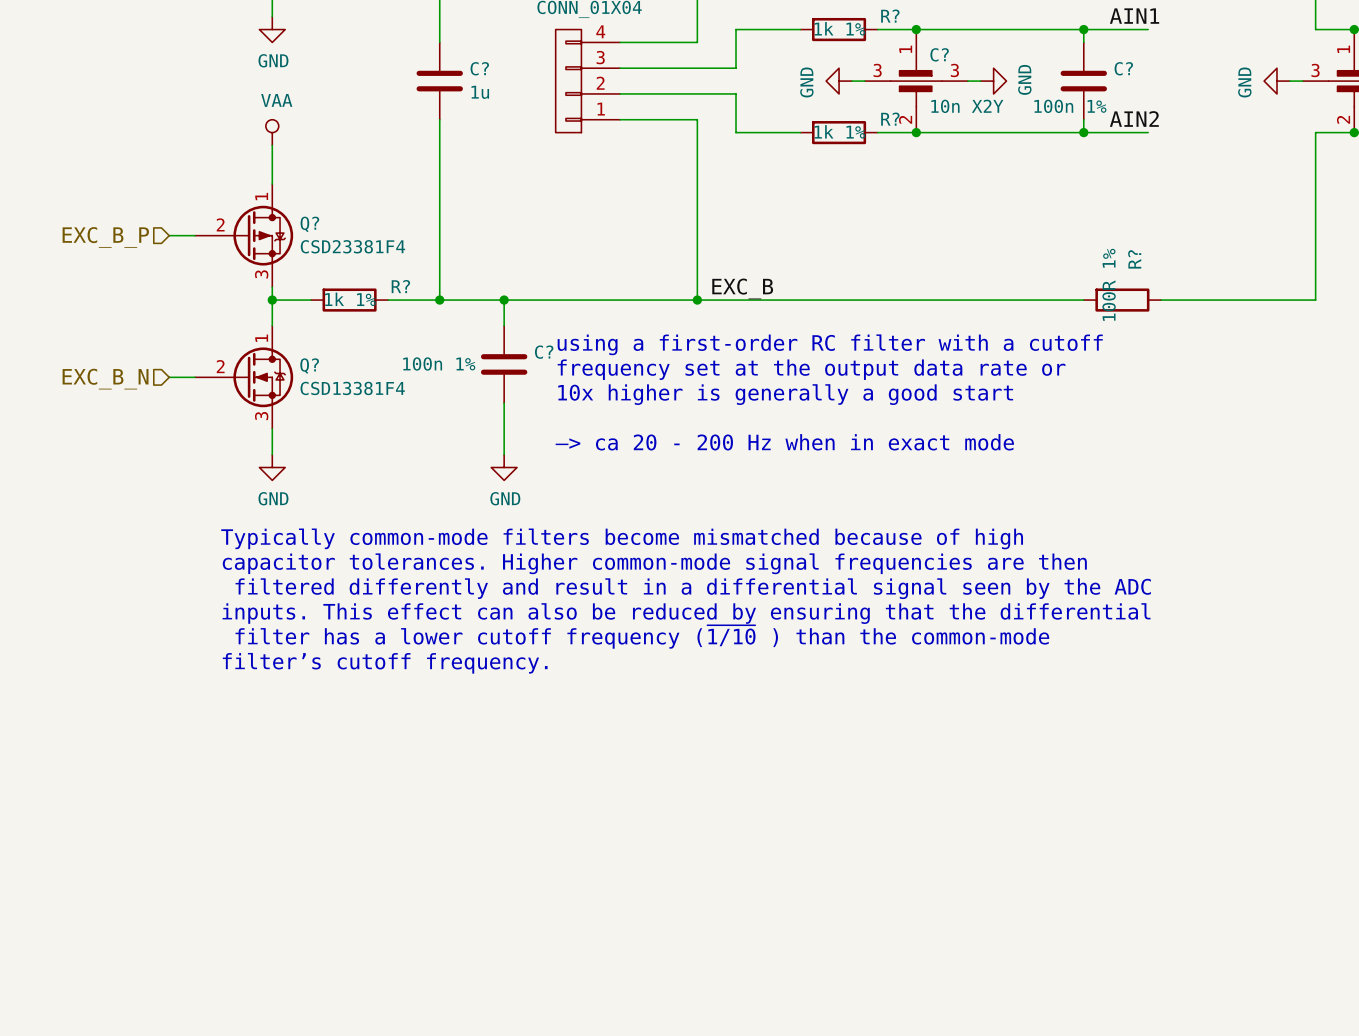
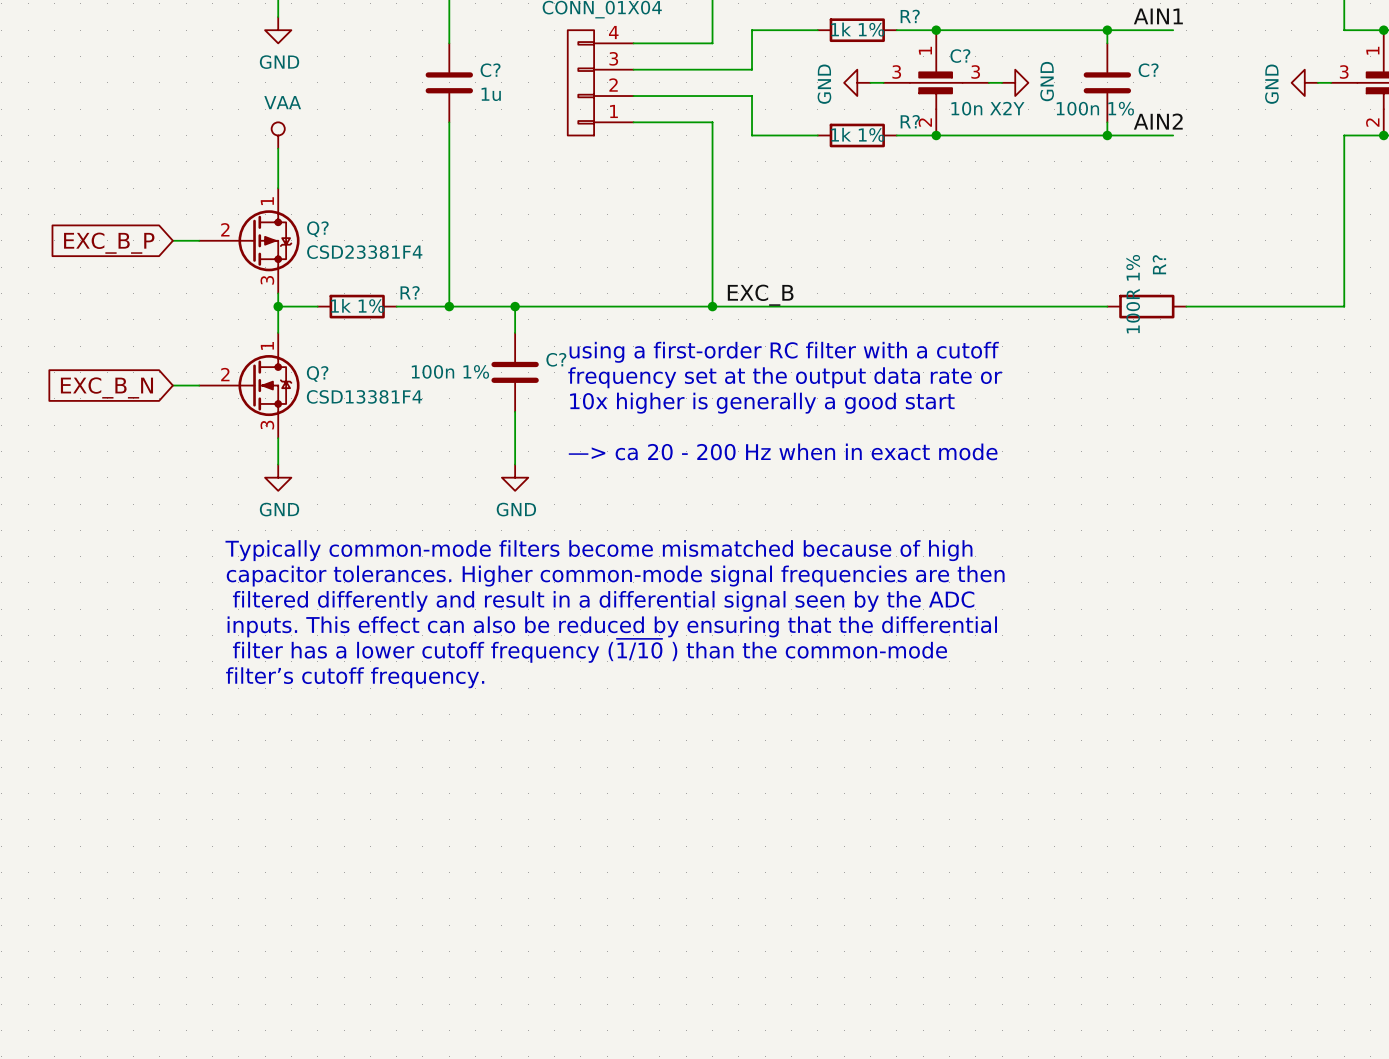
hierarchical label: EXC_B_P (105, 237) -> none
global label: none -> EXC_B_P (109, 243)
hierarchical label: EXC_B_N (105, 379) -> none
global label: none -> EXC_B_N (106, 387)

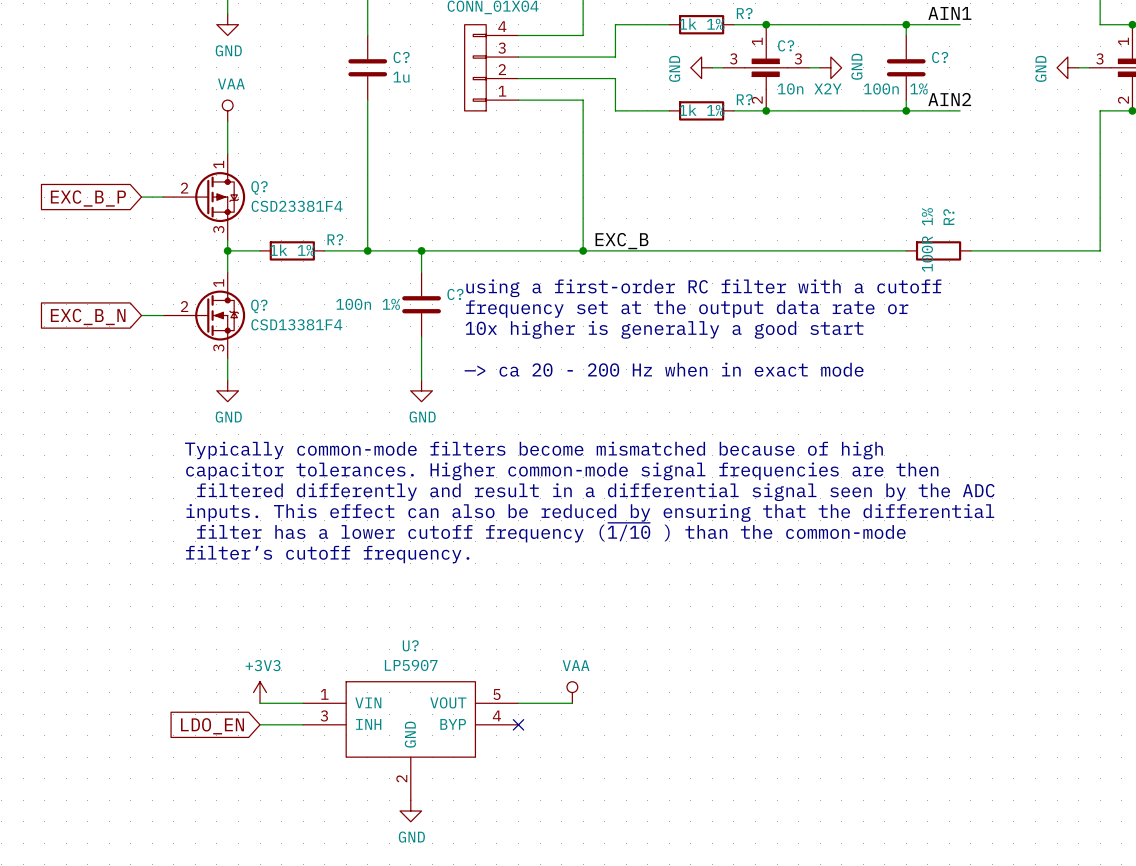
power symbol: none -> +3V3 (260, 692)
power symbol: none -> VAA (572, 692)
wire: none -> (260, 703) (303, 703)
wire: none -> (518, 703) (572, 703)
wire: none -> (260, 724) (303, 724)
no-connect mark: none -> (518, 724)
global label: none -> LDO_EN (212, 726)
U?: none -> LP5907 (410, 740)
power symbol: none -> GND (410, 810)

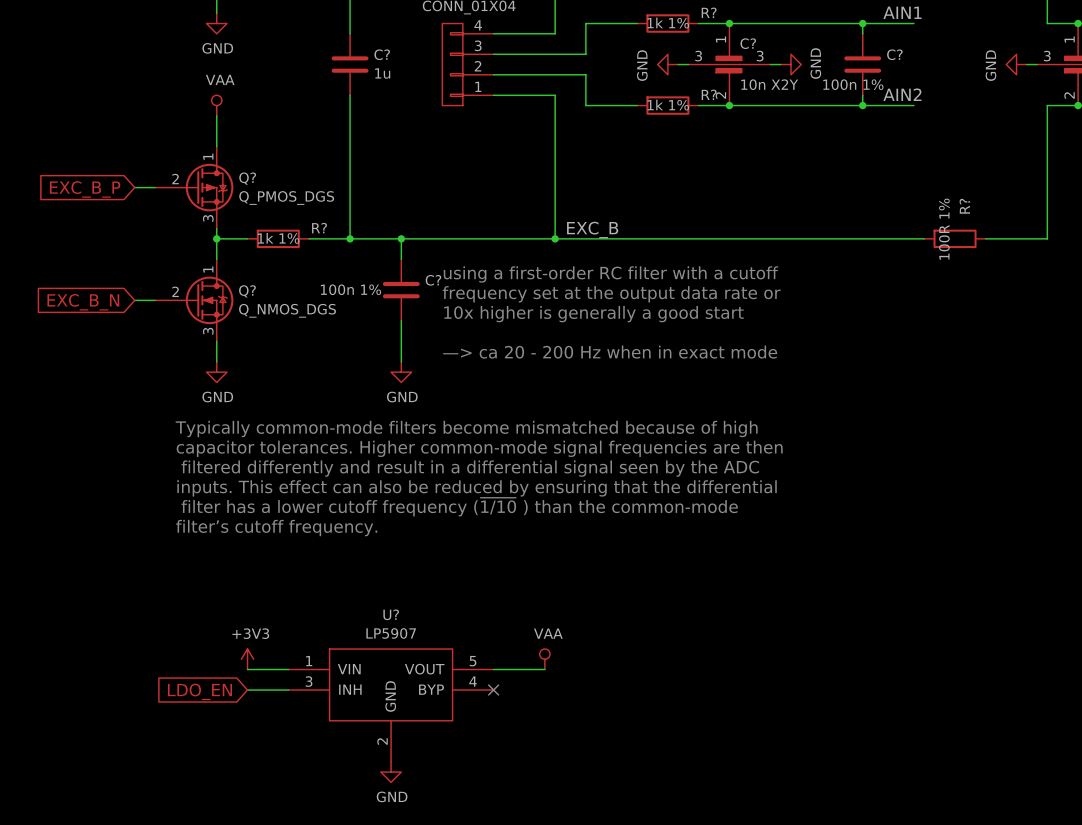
Q? value: CSD23381F4 (297, 206) -> Q_PMOS_DGS (286, 198)
R? position: (938, 250) -> (955, 238)
wire: (970, 250) (1035, 250) -> (924, 238) (862, 238)
Q? value: CSD13381F4 (296, 324) -> Q_NMOS_DGS (287, 310)

